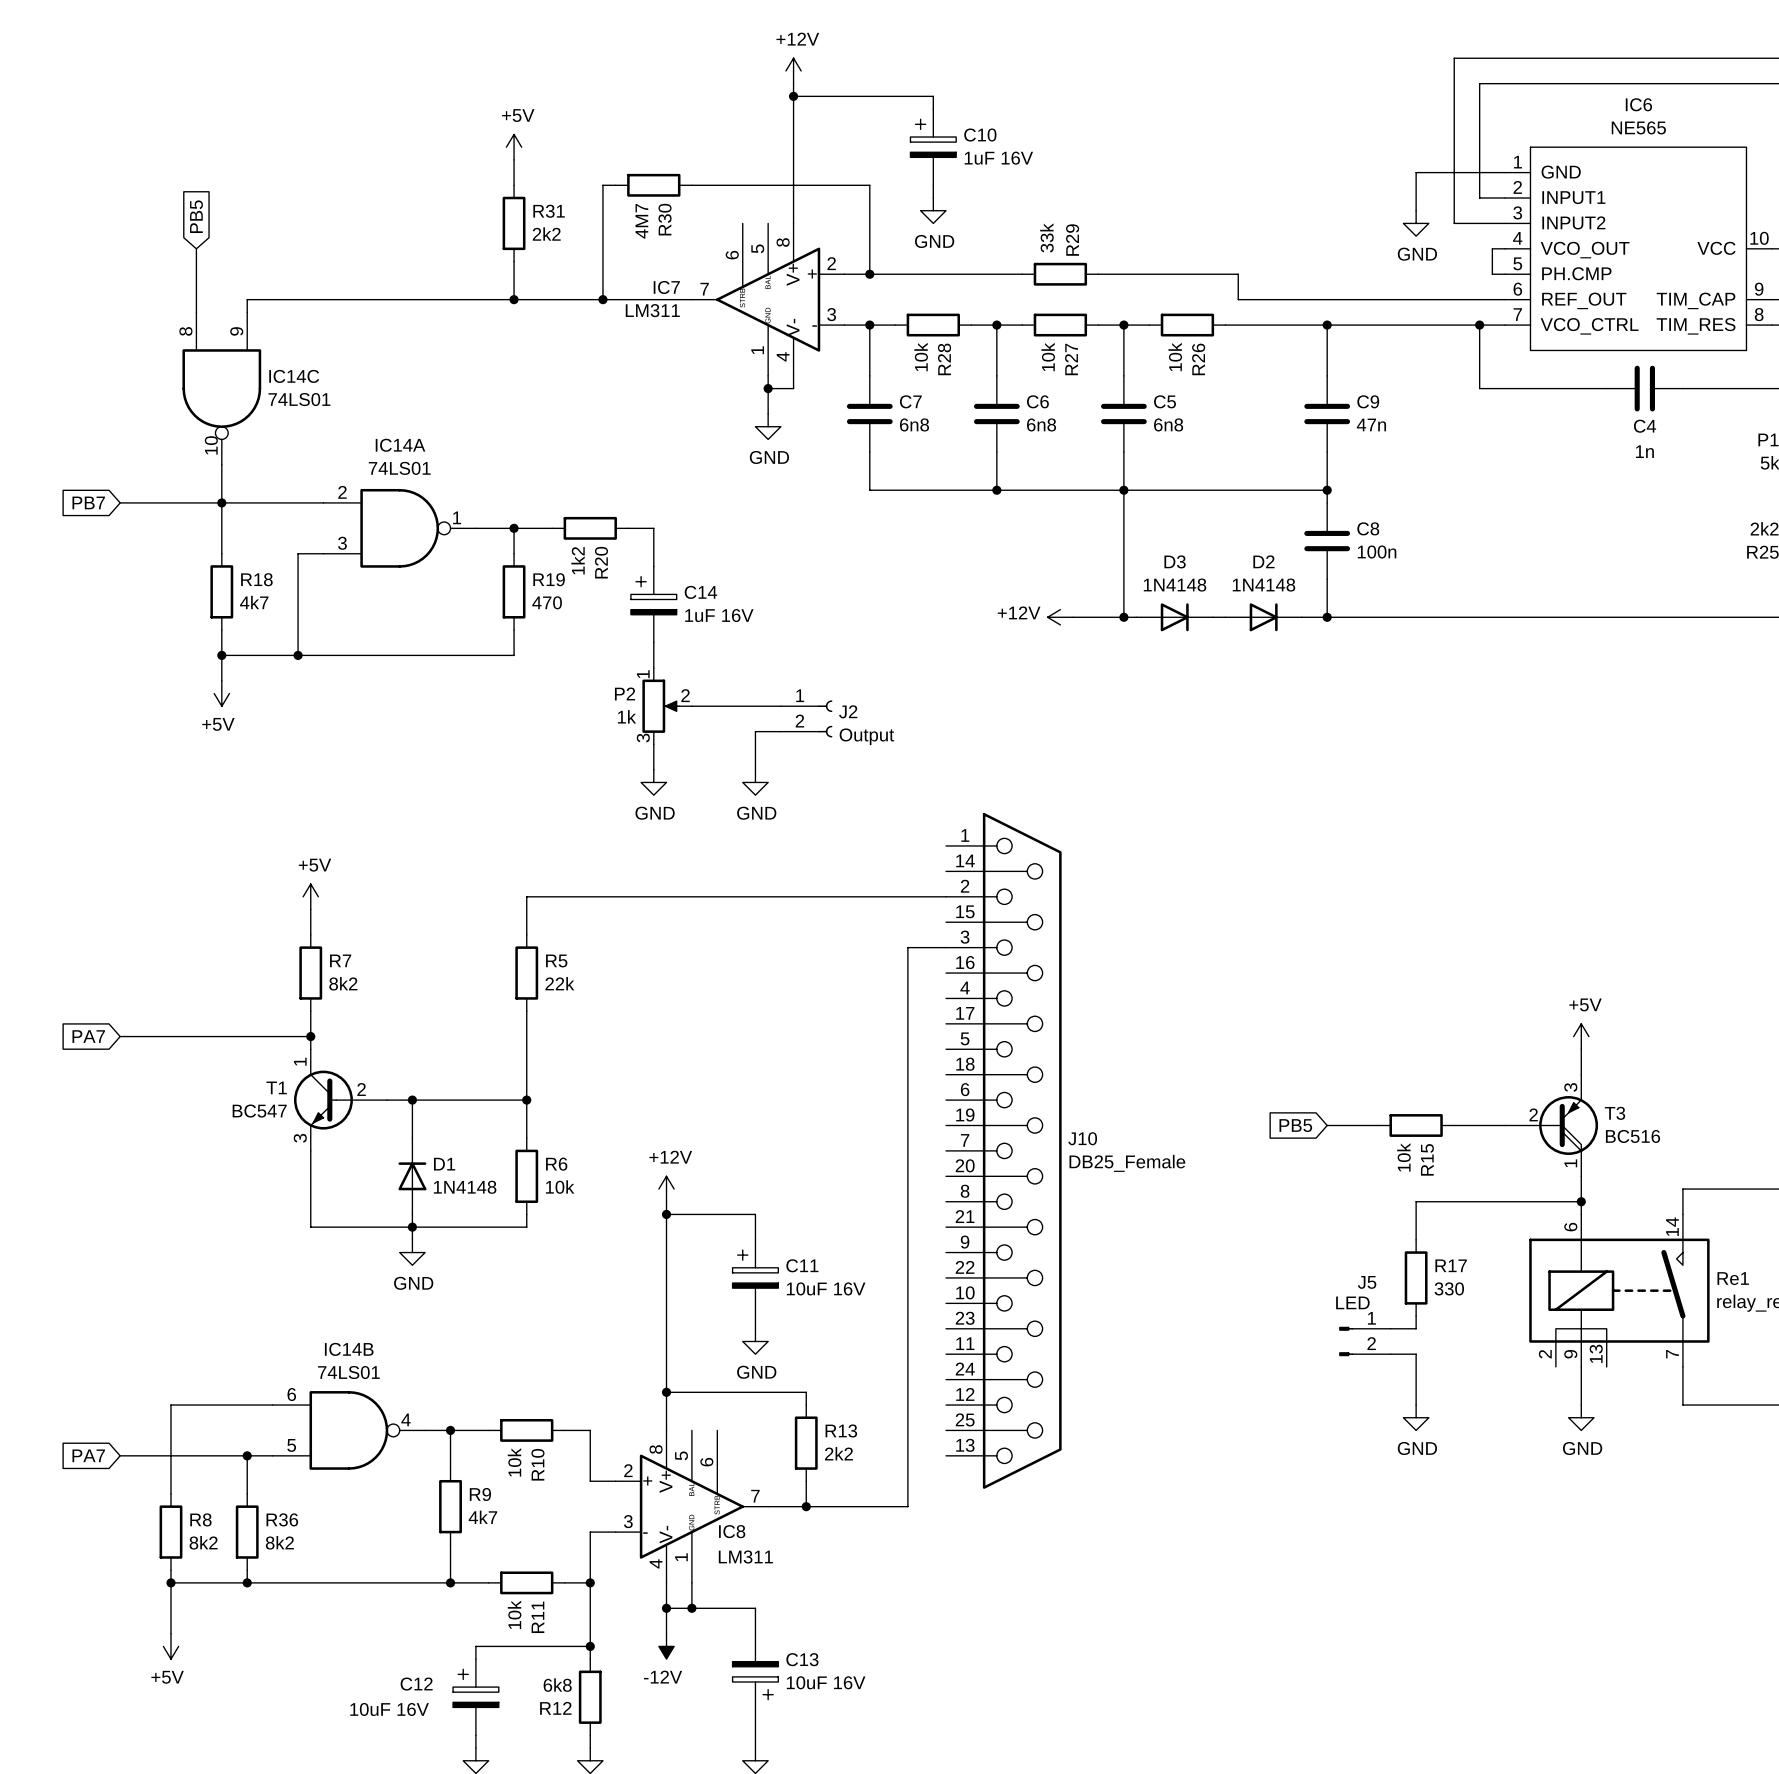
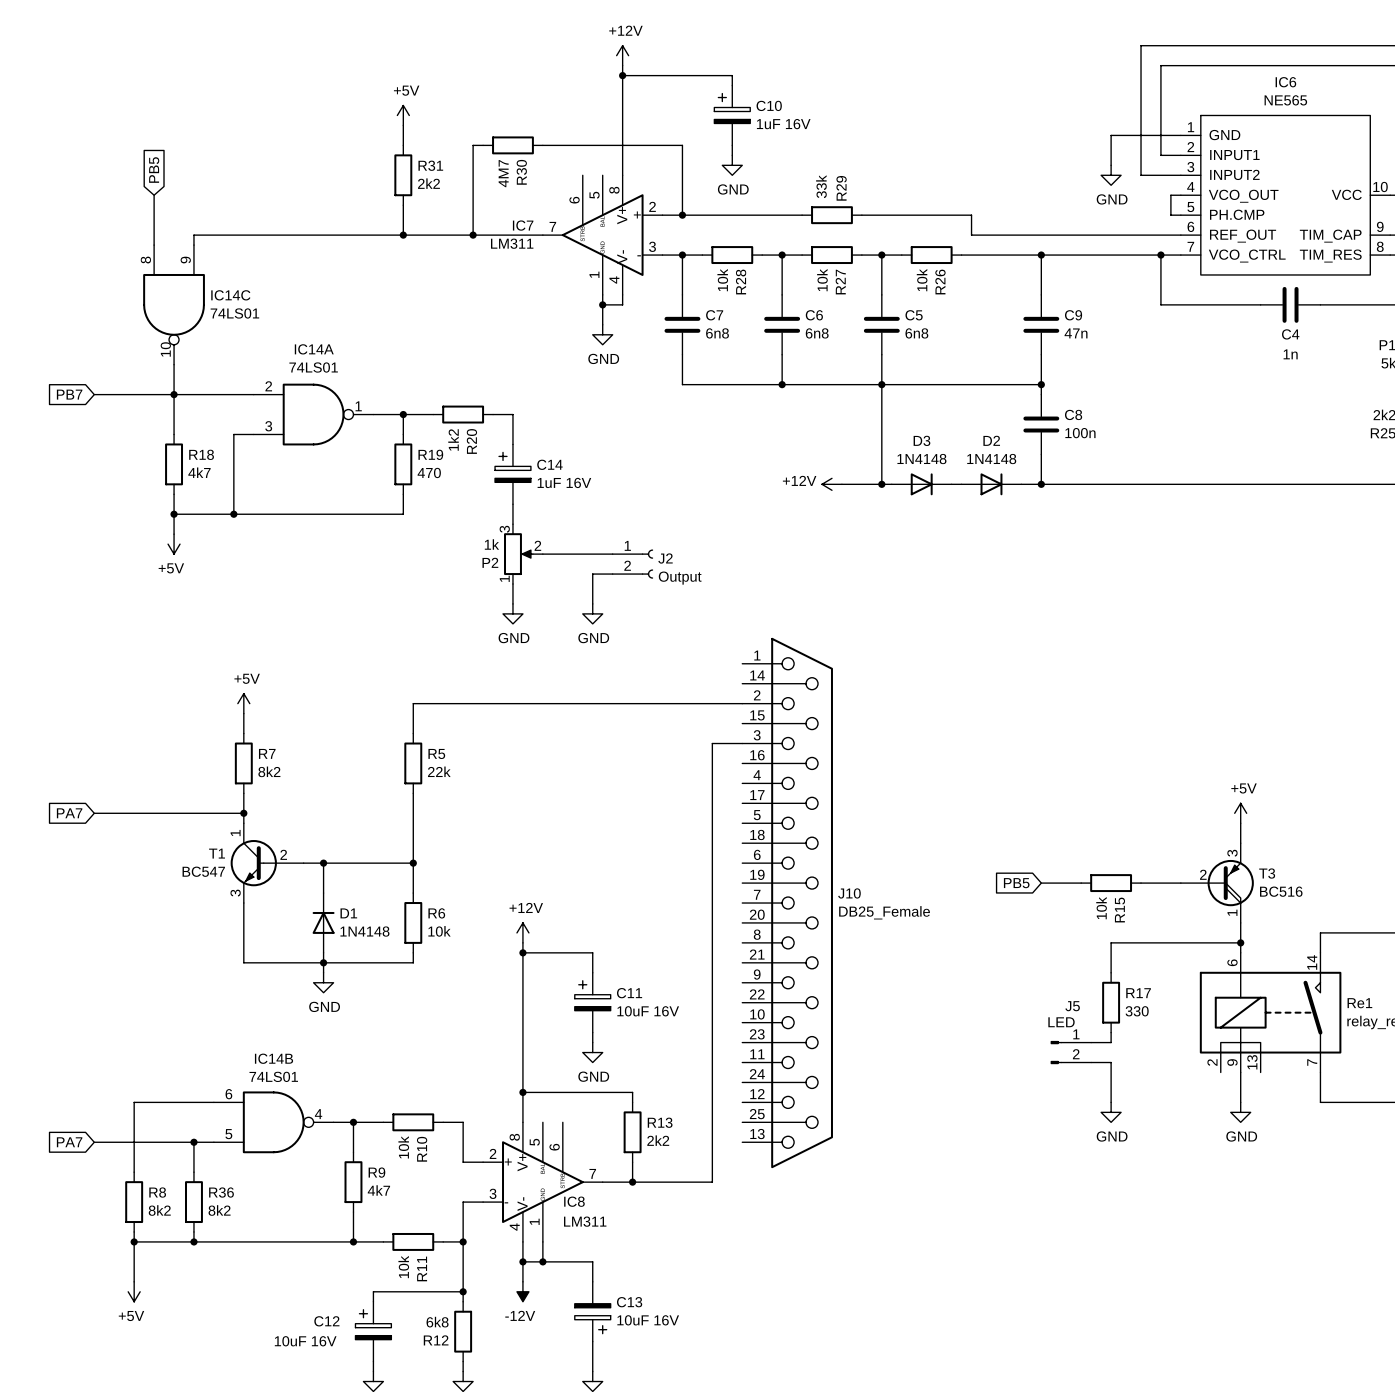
P2 flip: as is (660, 706) -> up-down (518, 554)

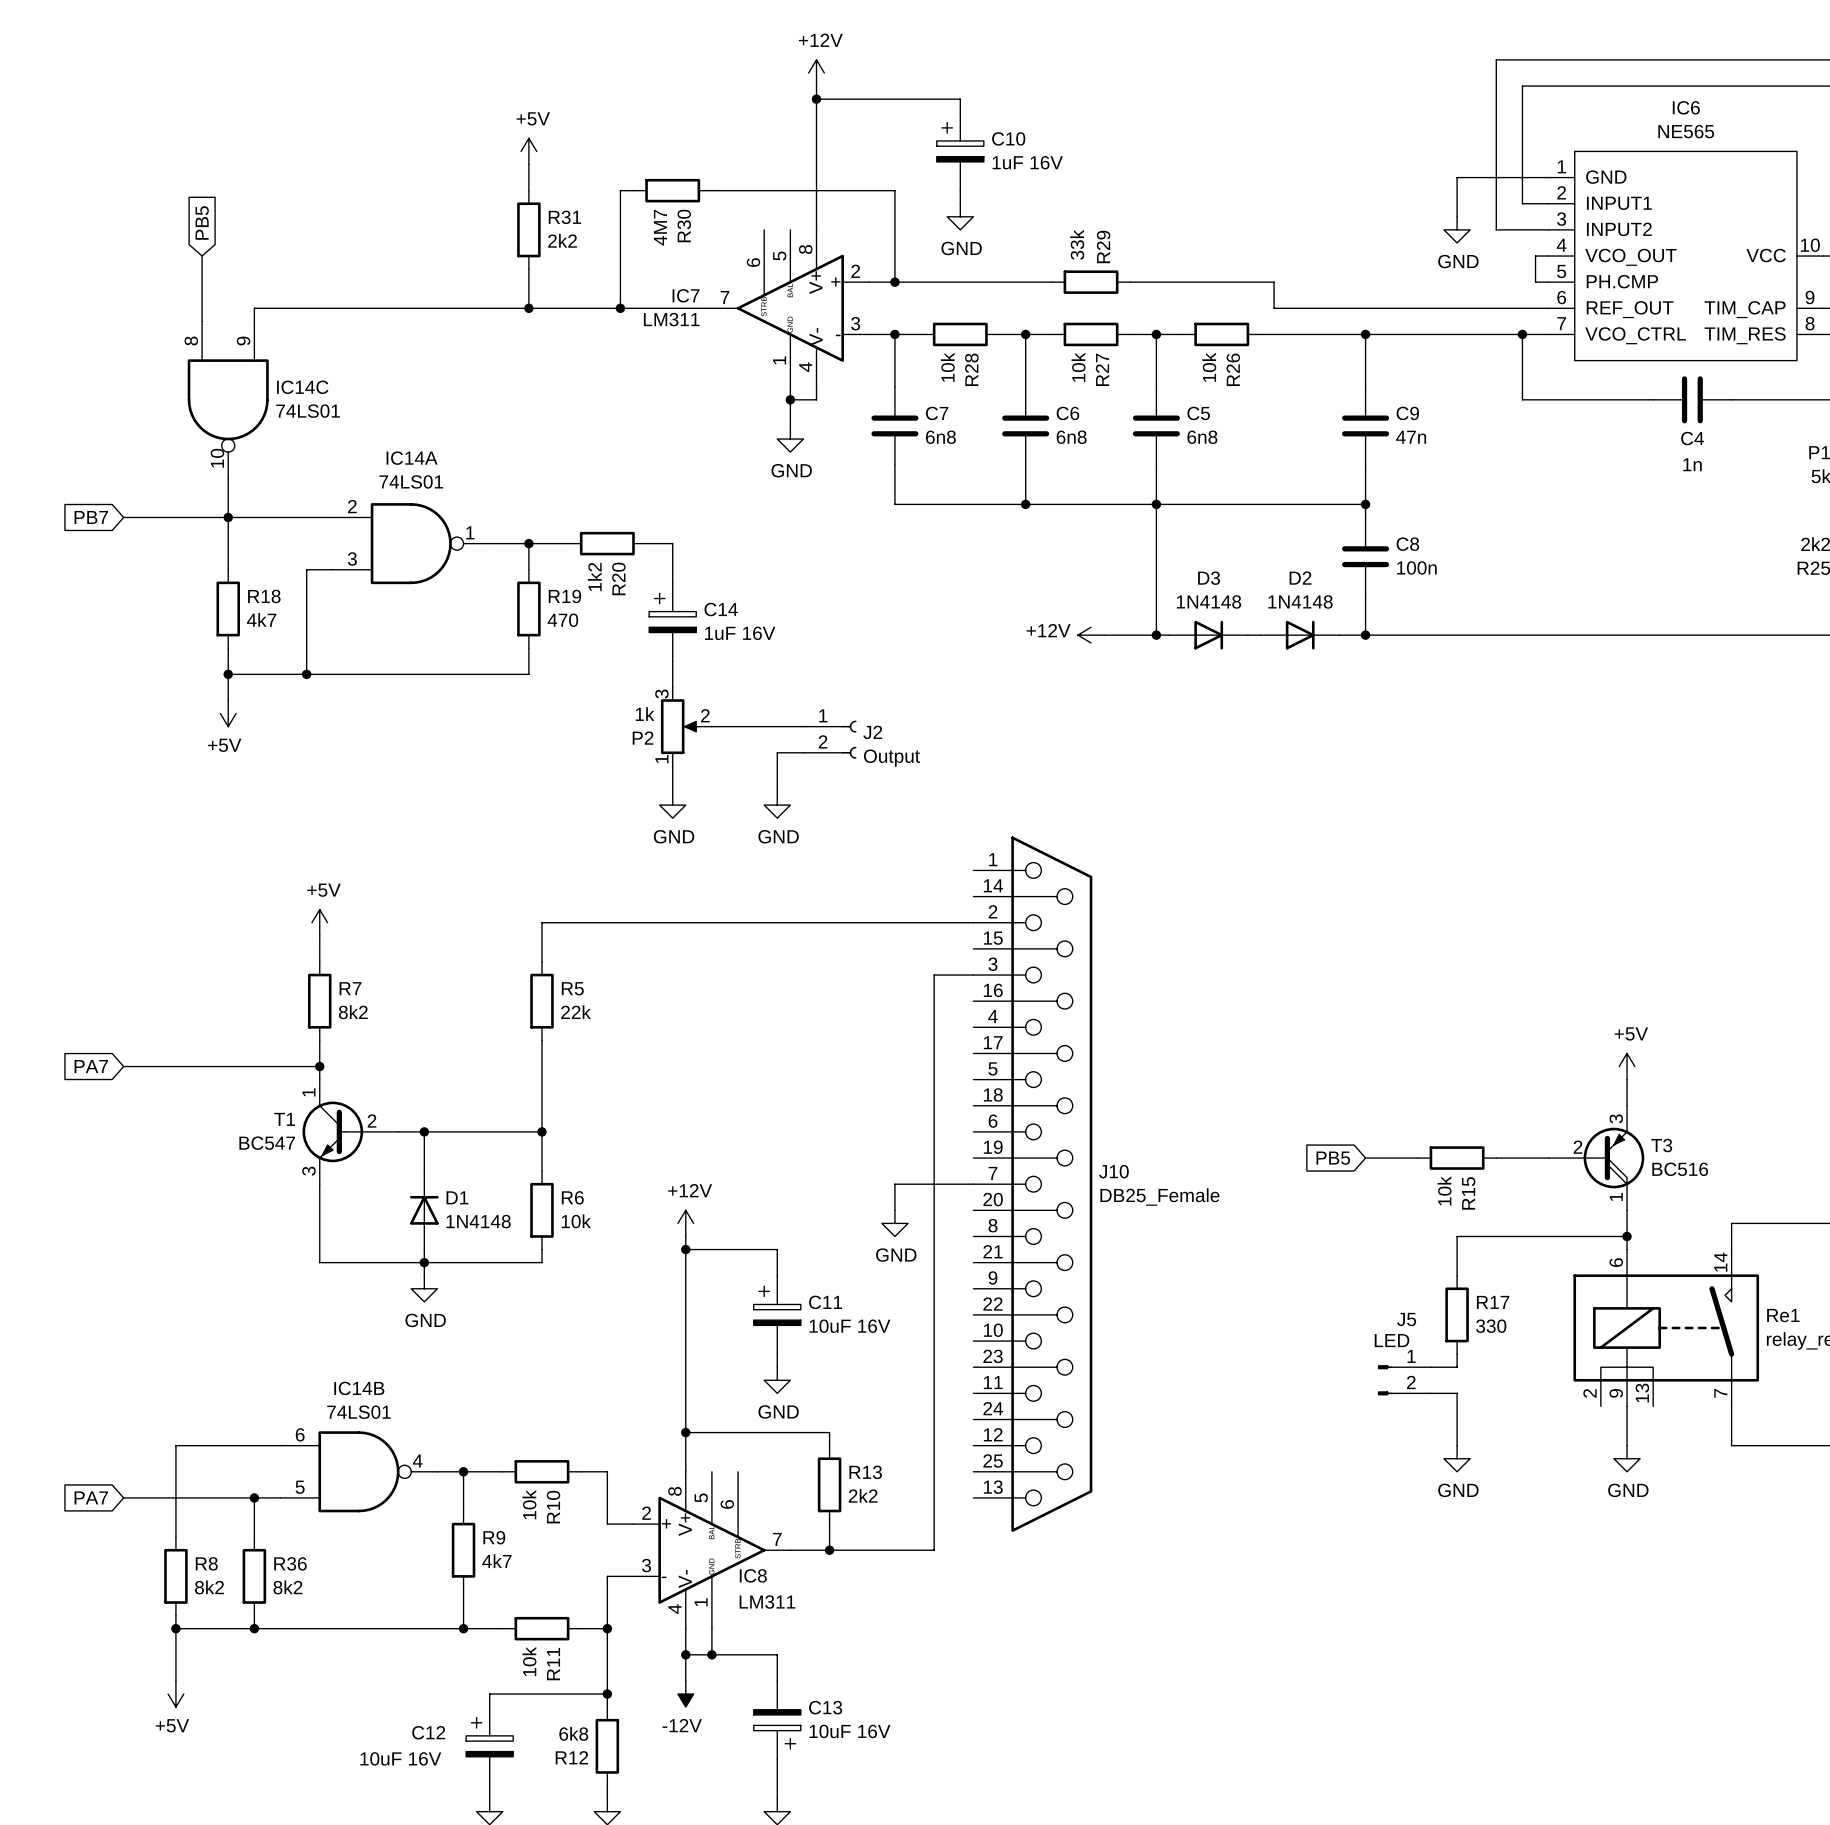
wire: none -> (973, 1184) (894, 1184) (894, 1210)
power symbol: none -> GND (894, 1223)

